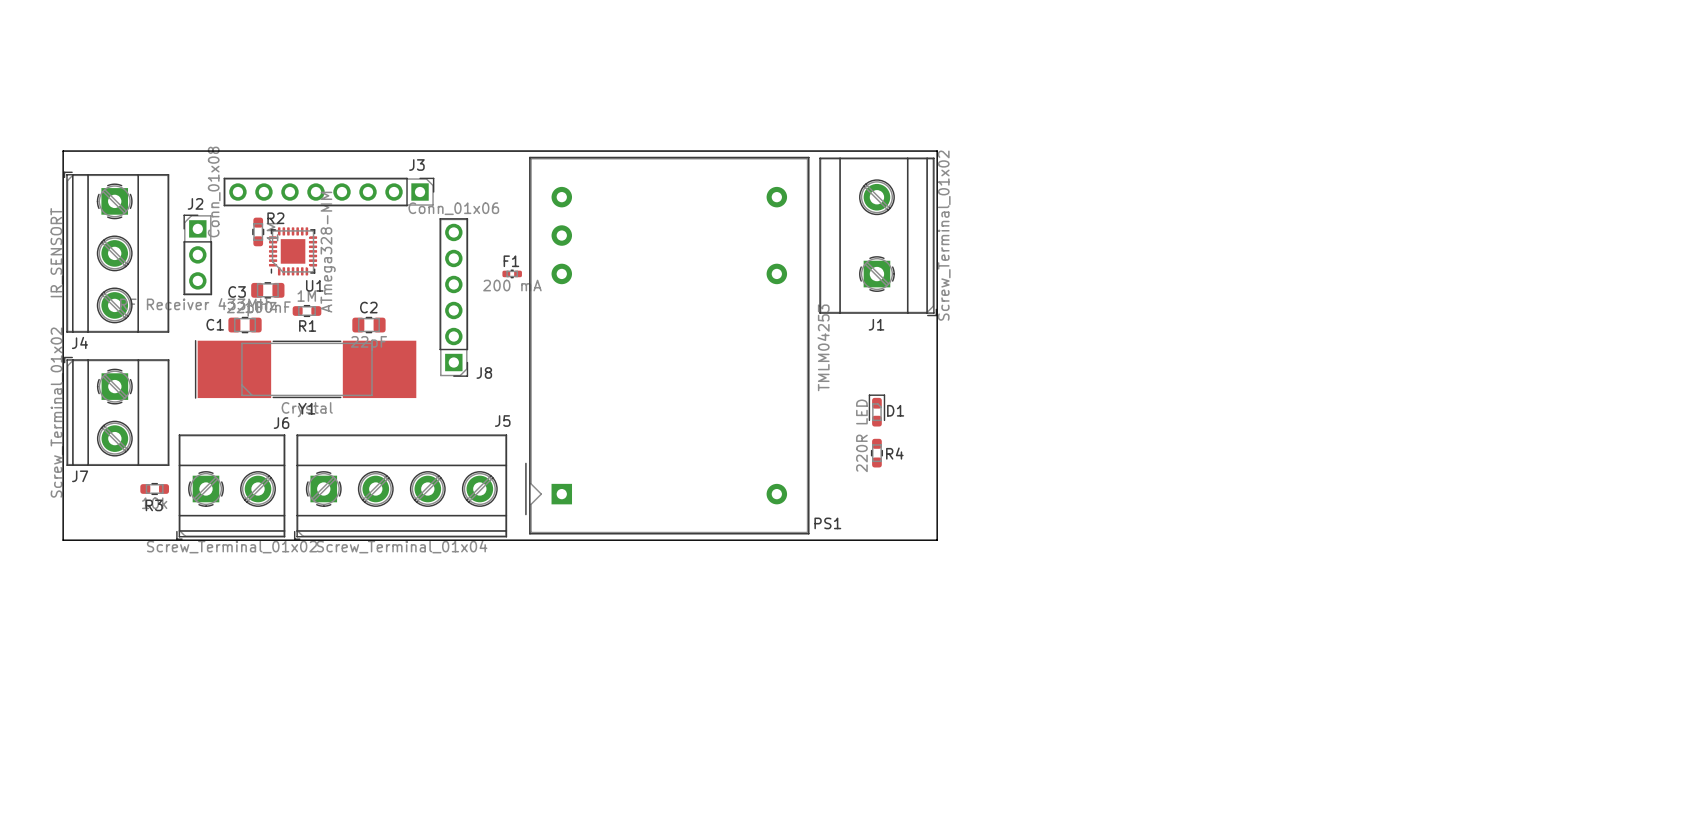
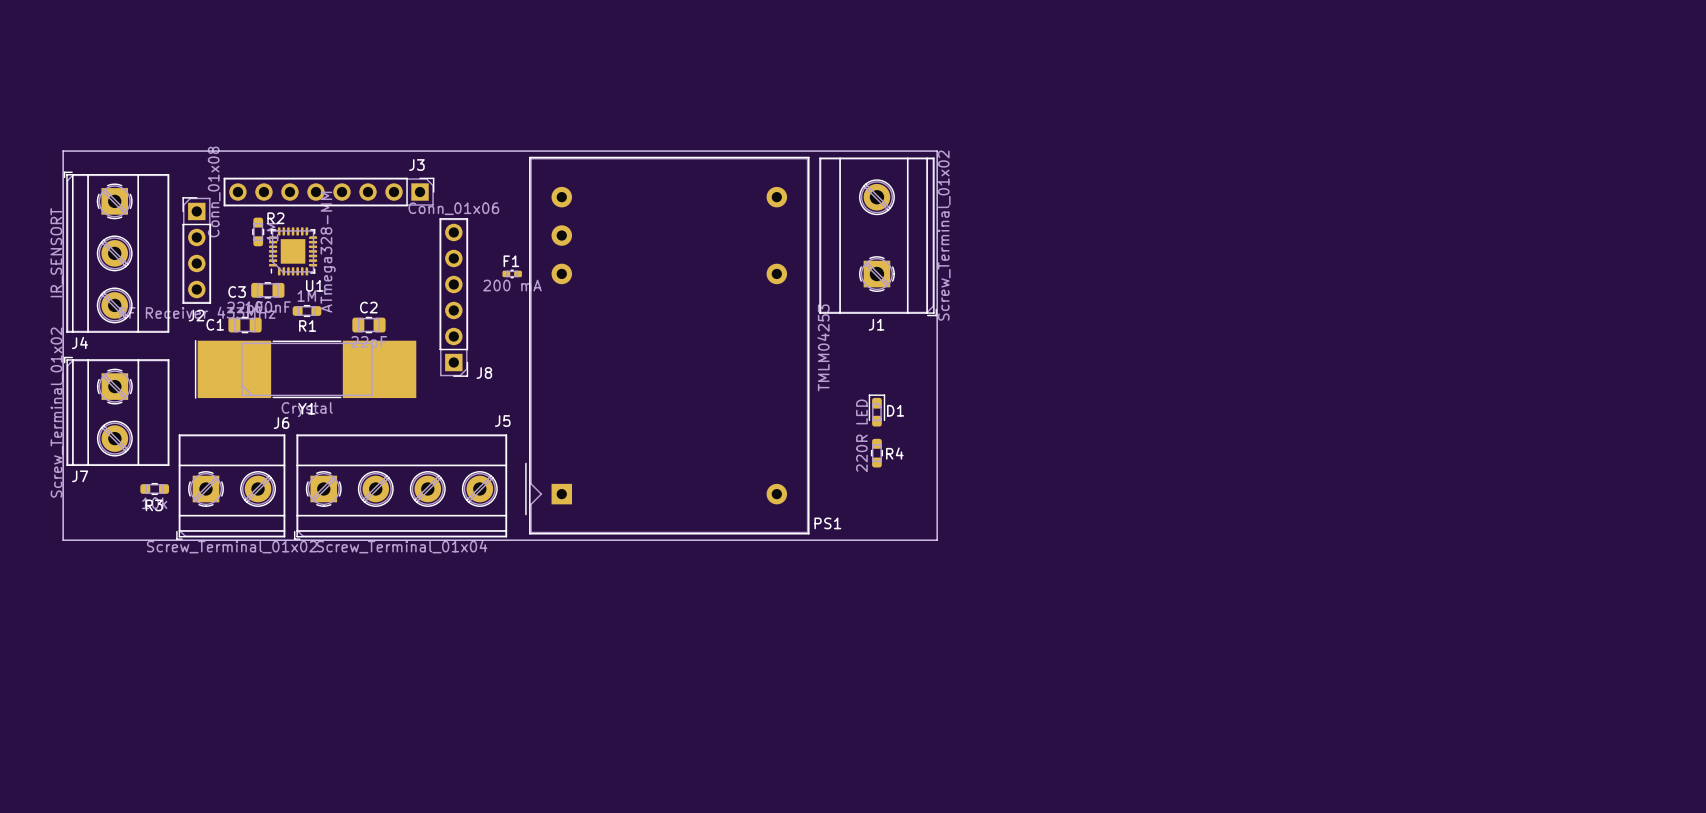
J2 name position: J2 (195, 203) -> J2 (196, 315)
J2 footprint: [183, 214, 213, 296] -> [182, 197, 212, 304]

